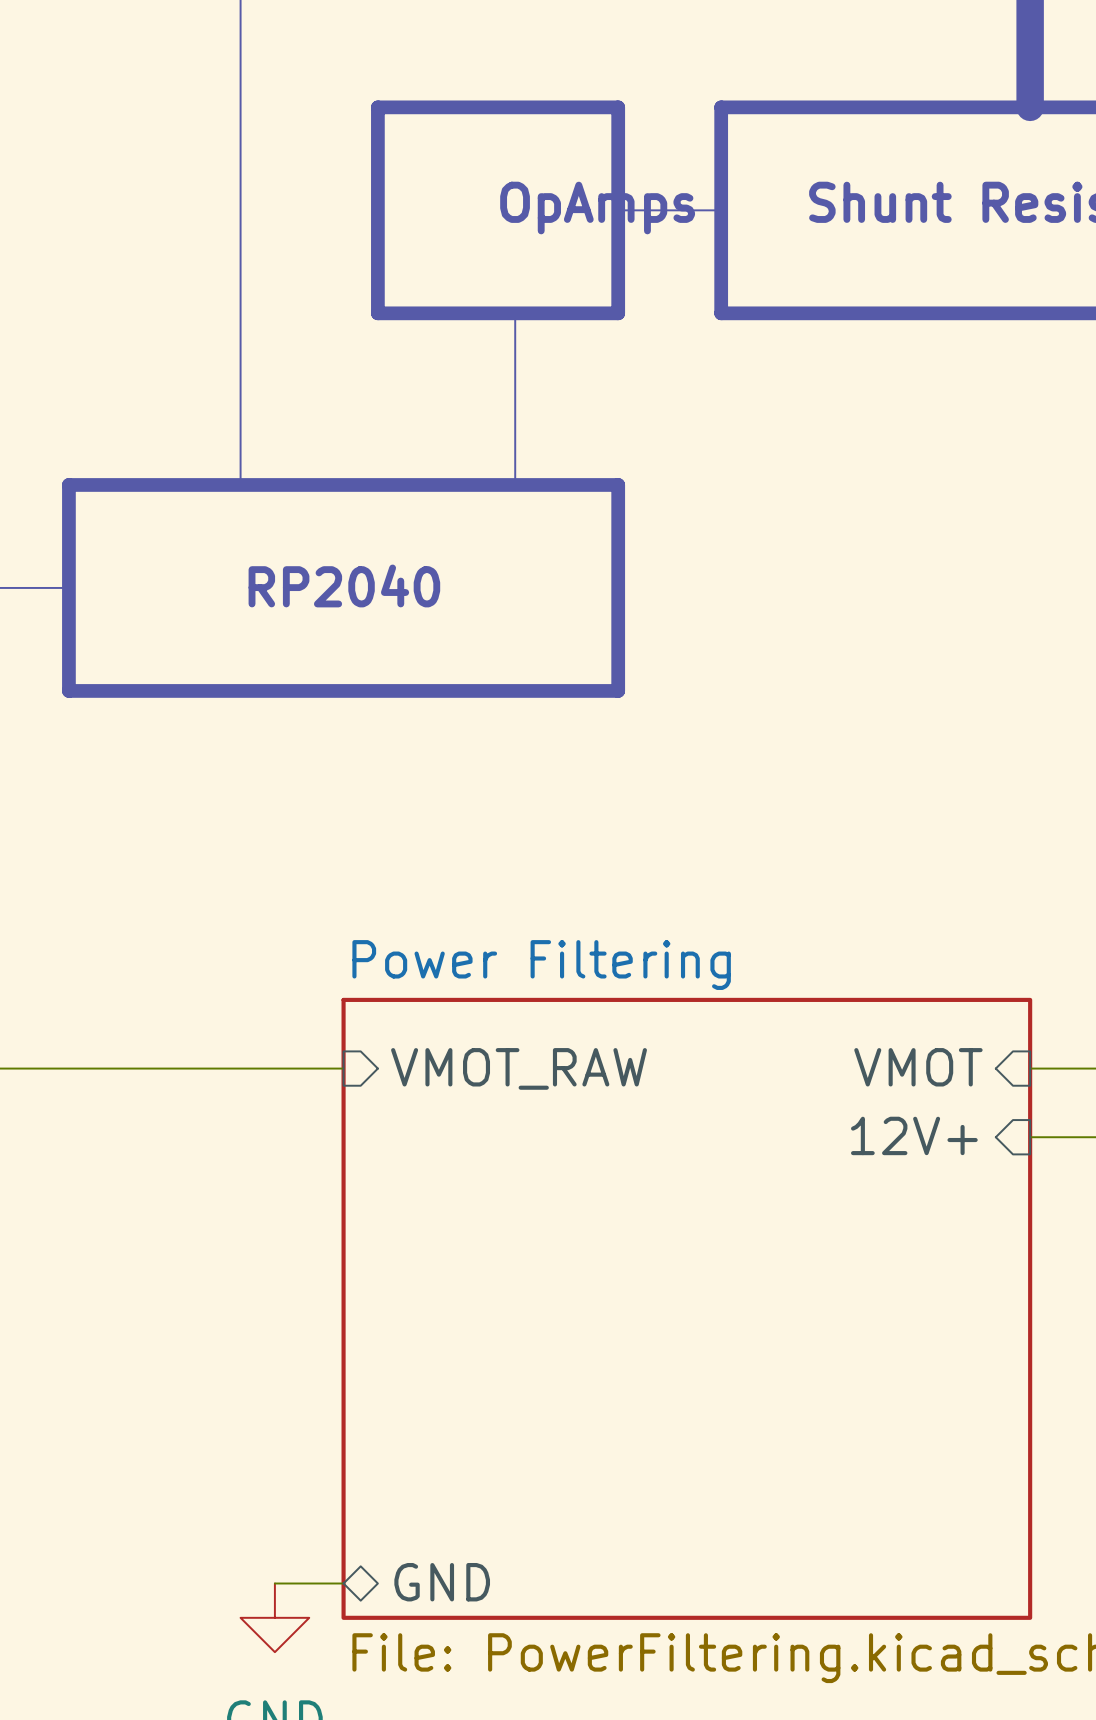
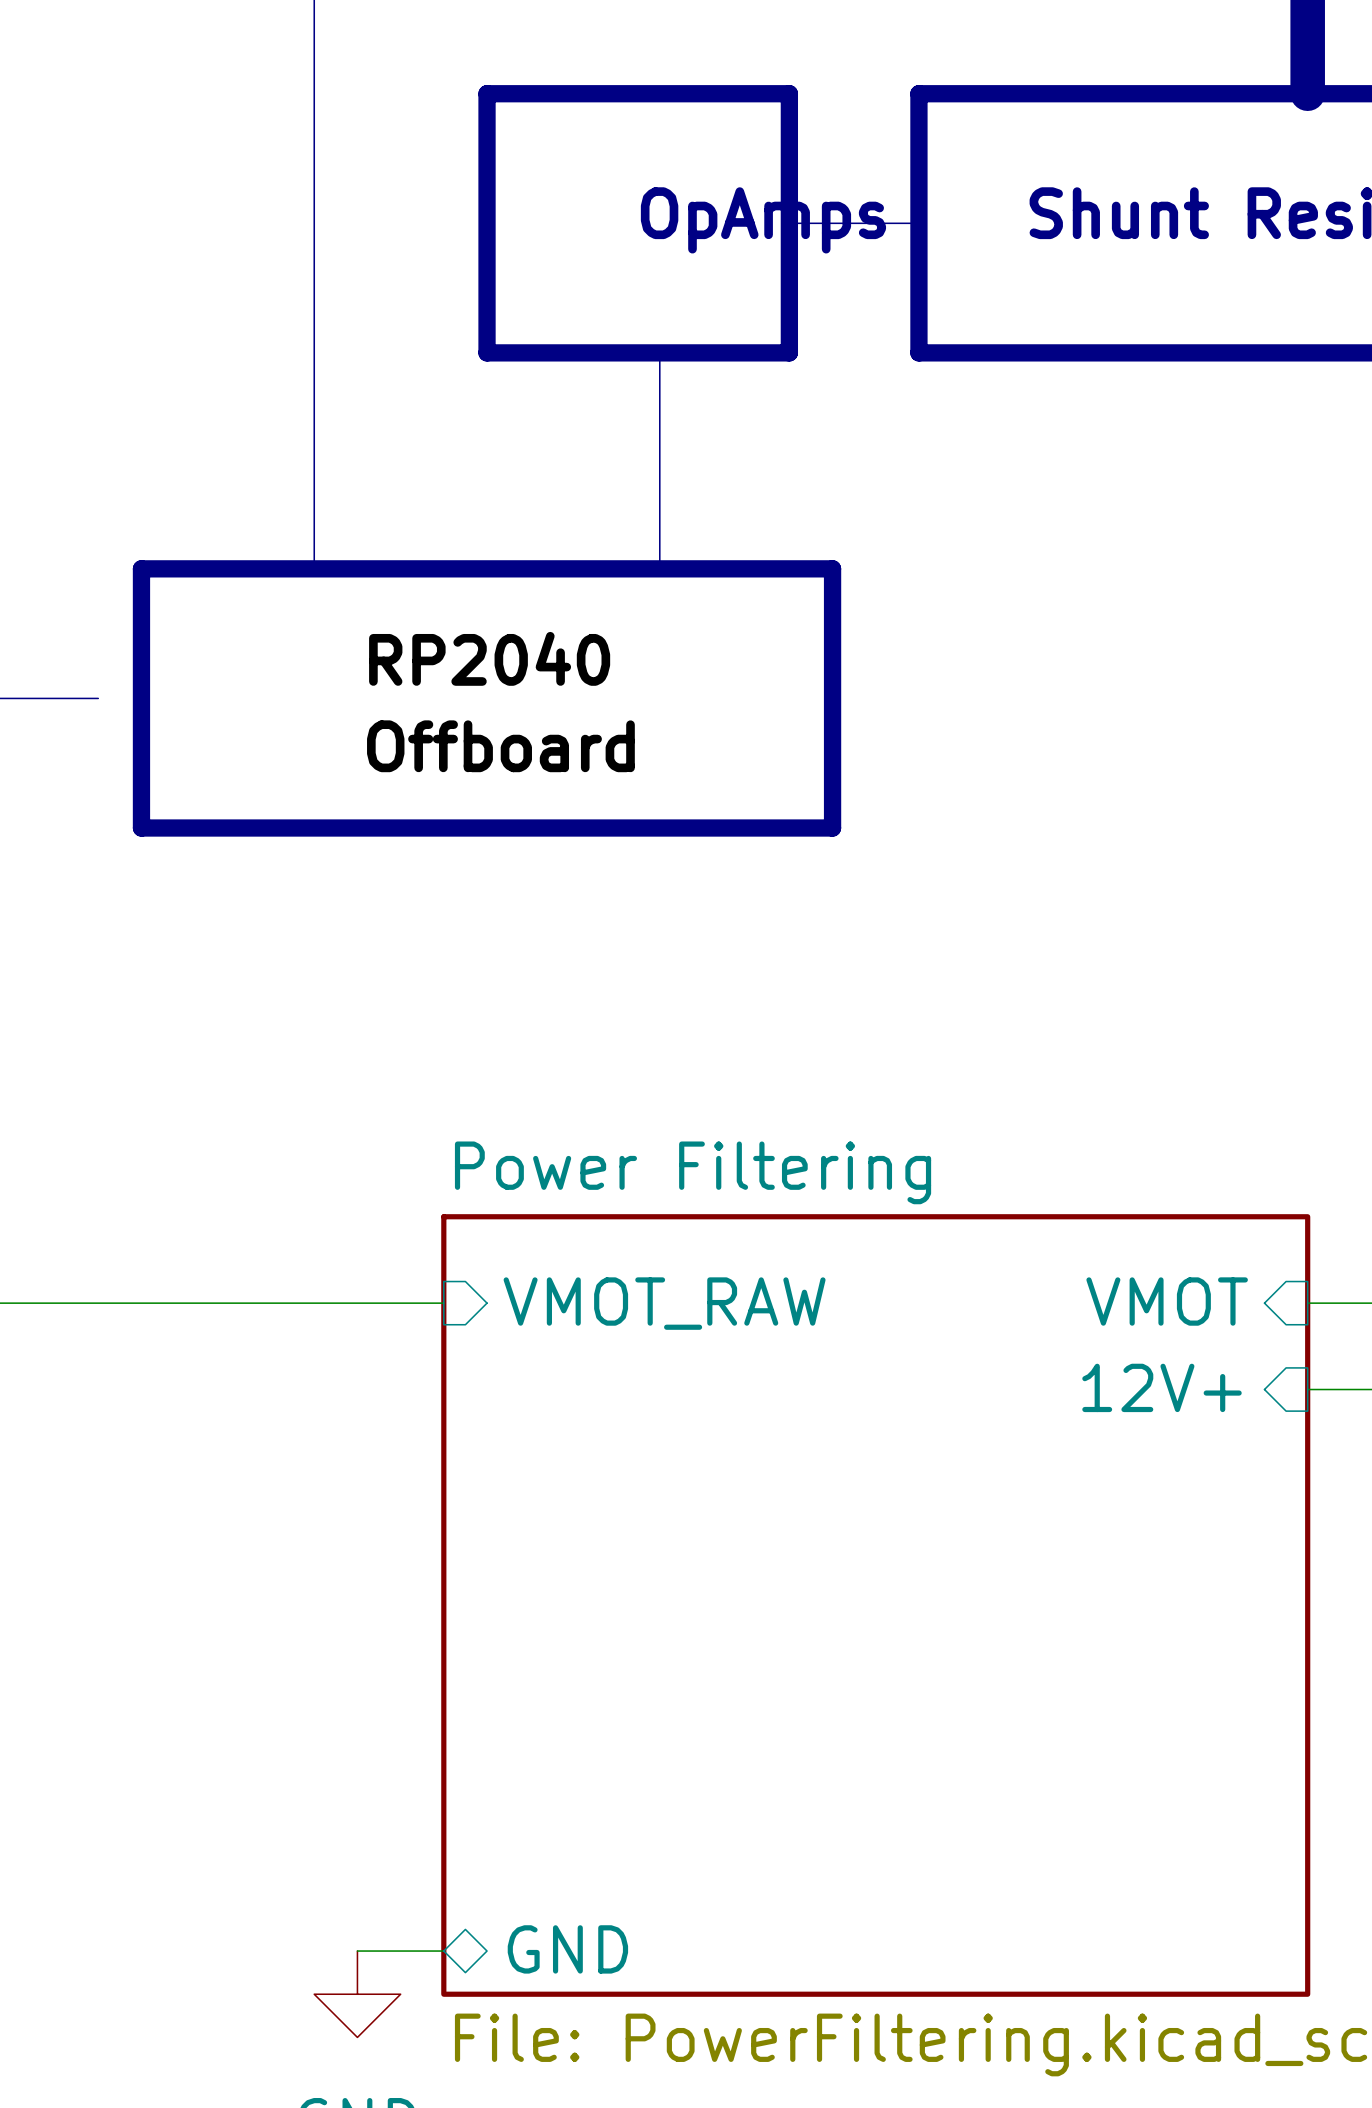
line: (103, 484) (68, 484) (68, 690) (103, 690) -> (141, 568) (141, 828)
line: (618, 484) (618, 690) -> (789, 568) (832, 568) (832, 828) (789, 828)
label: none -> RP2040 (489, 658)
text: RP2040 (344, 585) -> none
label: none -> Offboard (500, 746)

